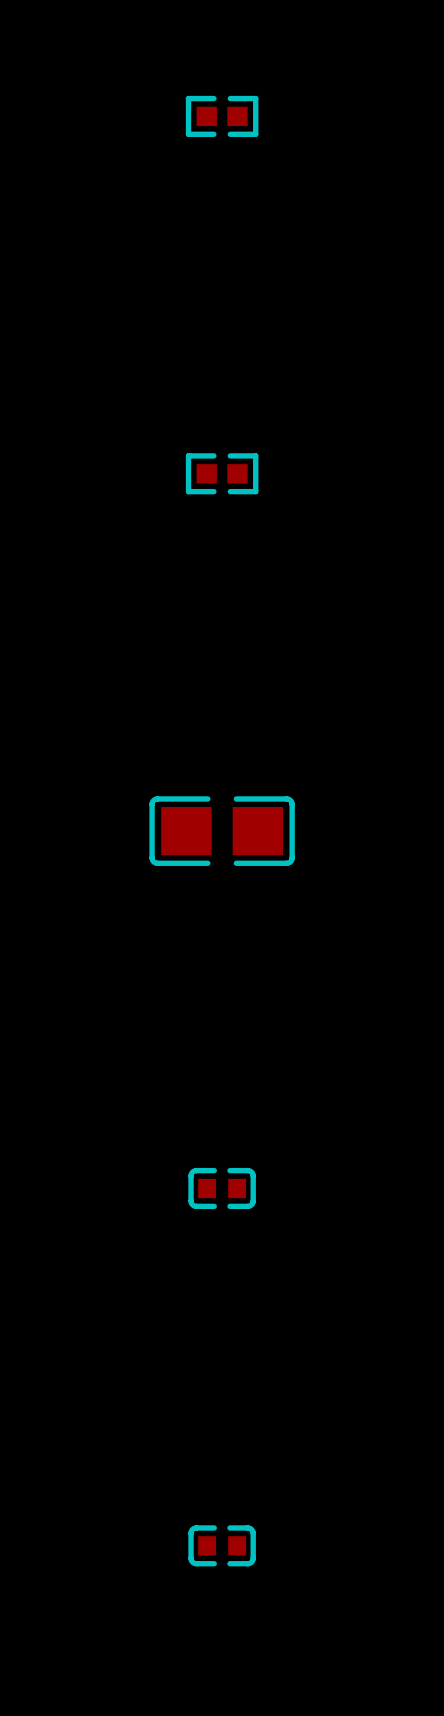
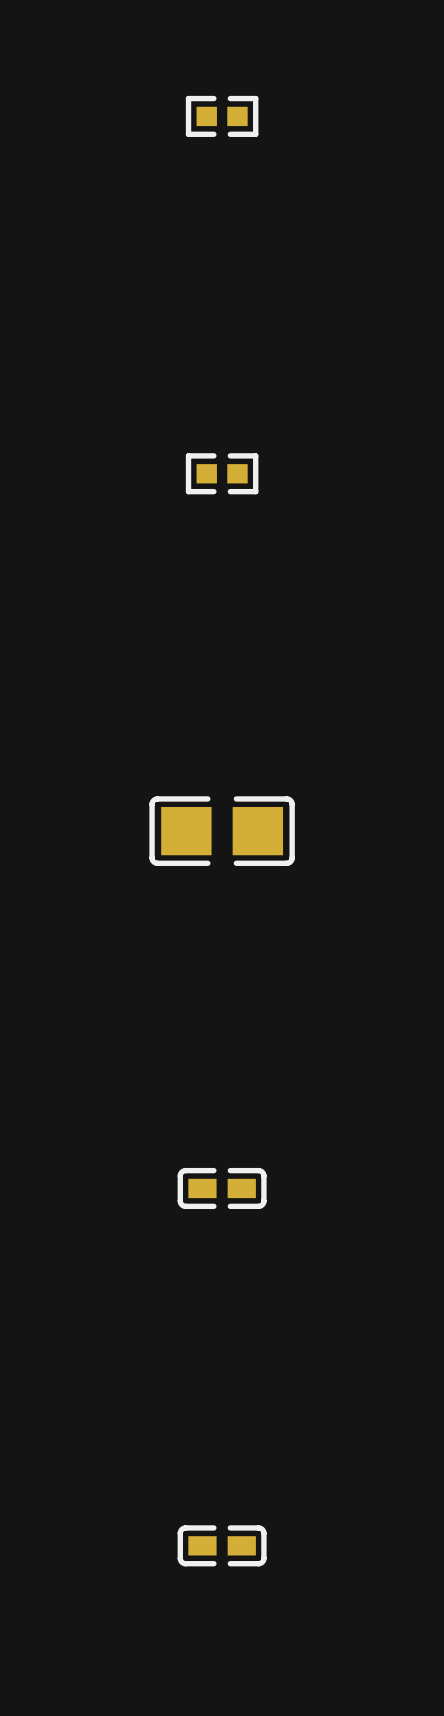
part footprint: [188, 1167, 256, 1210] -> [177, 1167, 267, 1210]
part footprint: [188, 1525, 256, 1567] -> [177, 1525, 267, 1567]

